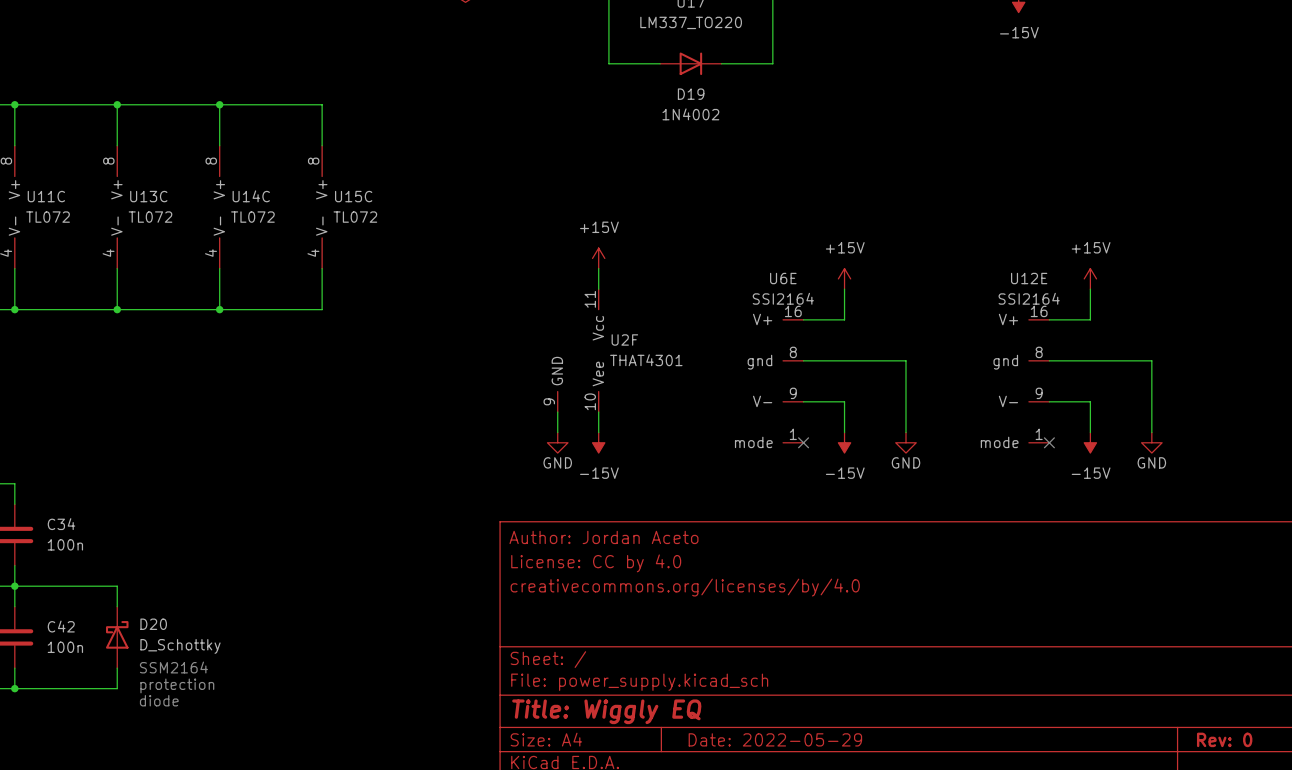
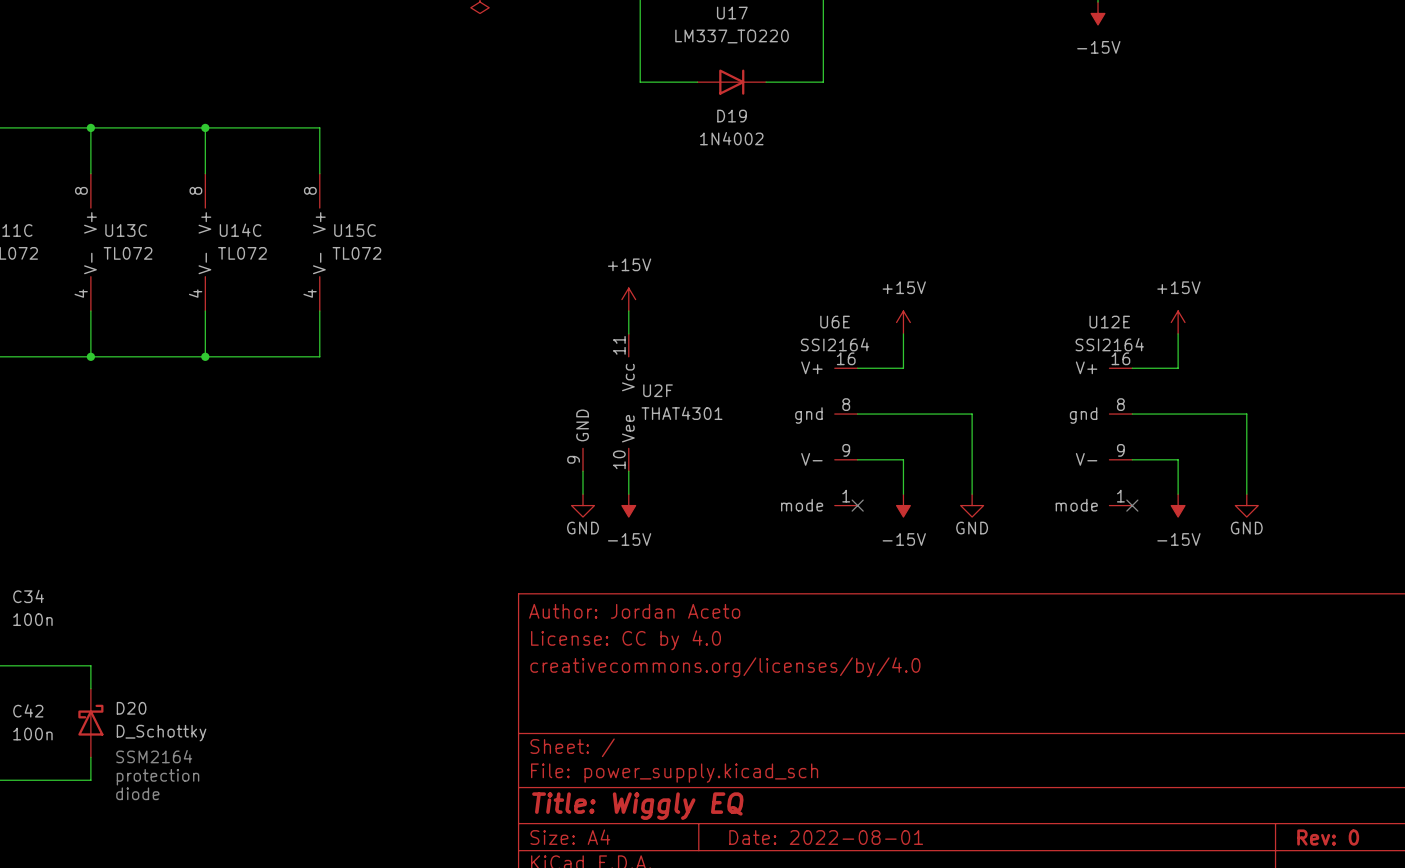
title block: Date: 2022-05-29 (775, 739) -> Date: 2022-08-01 (826, 837)

